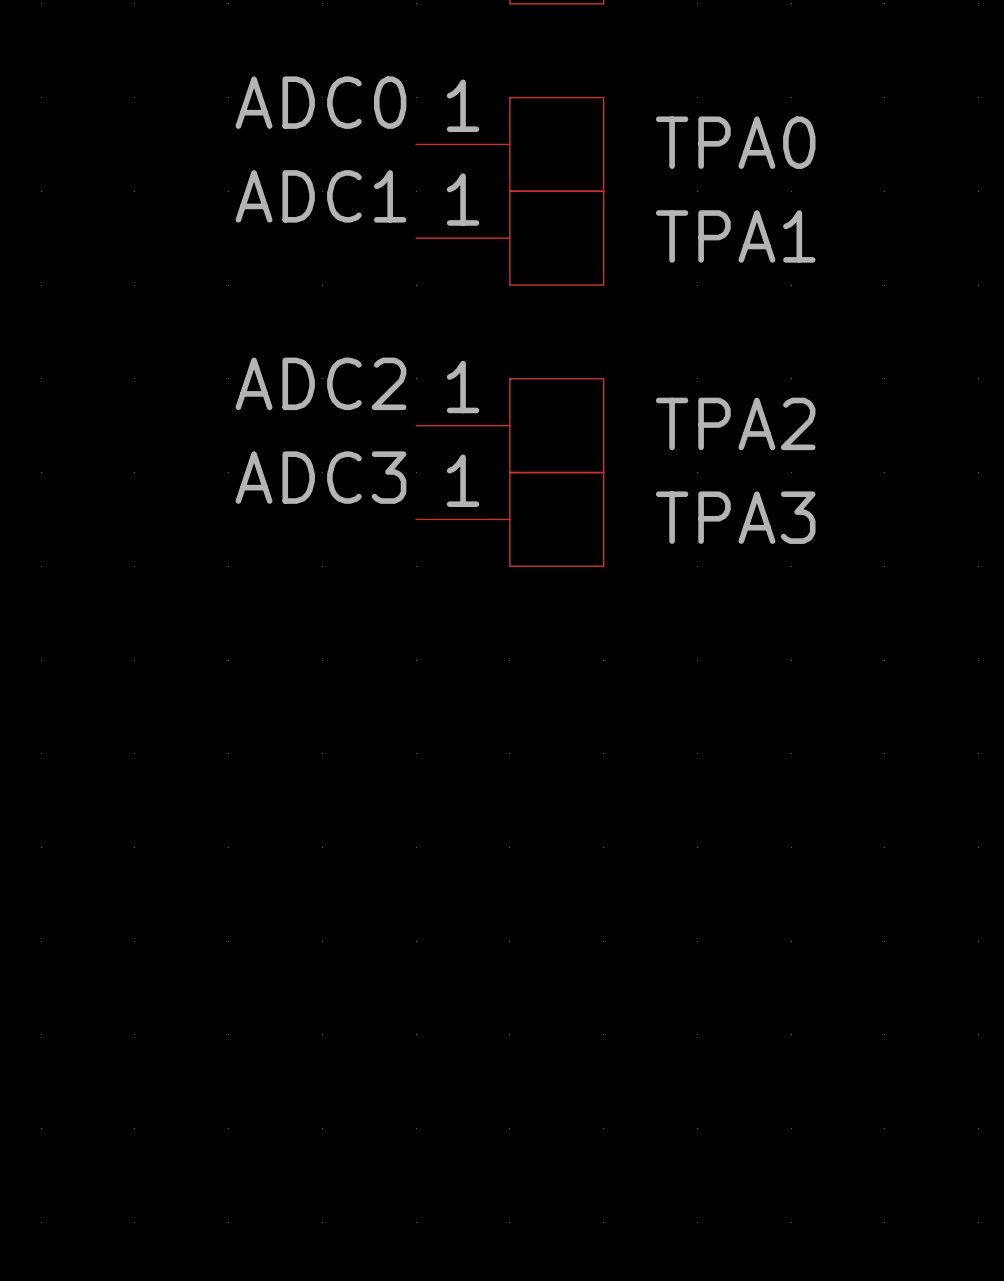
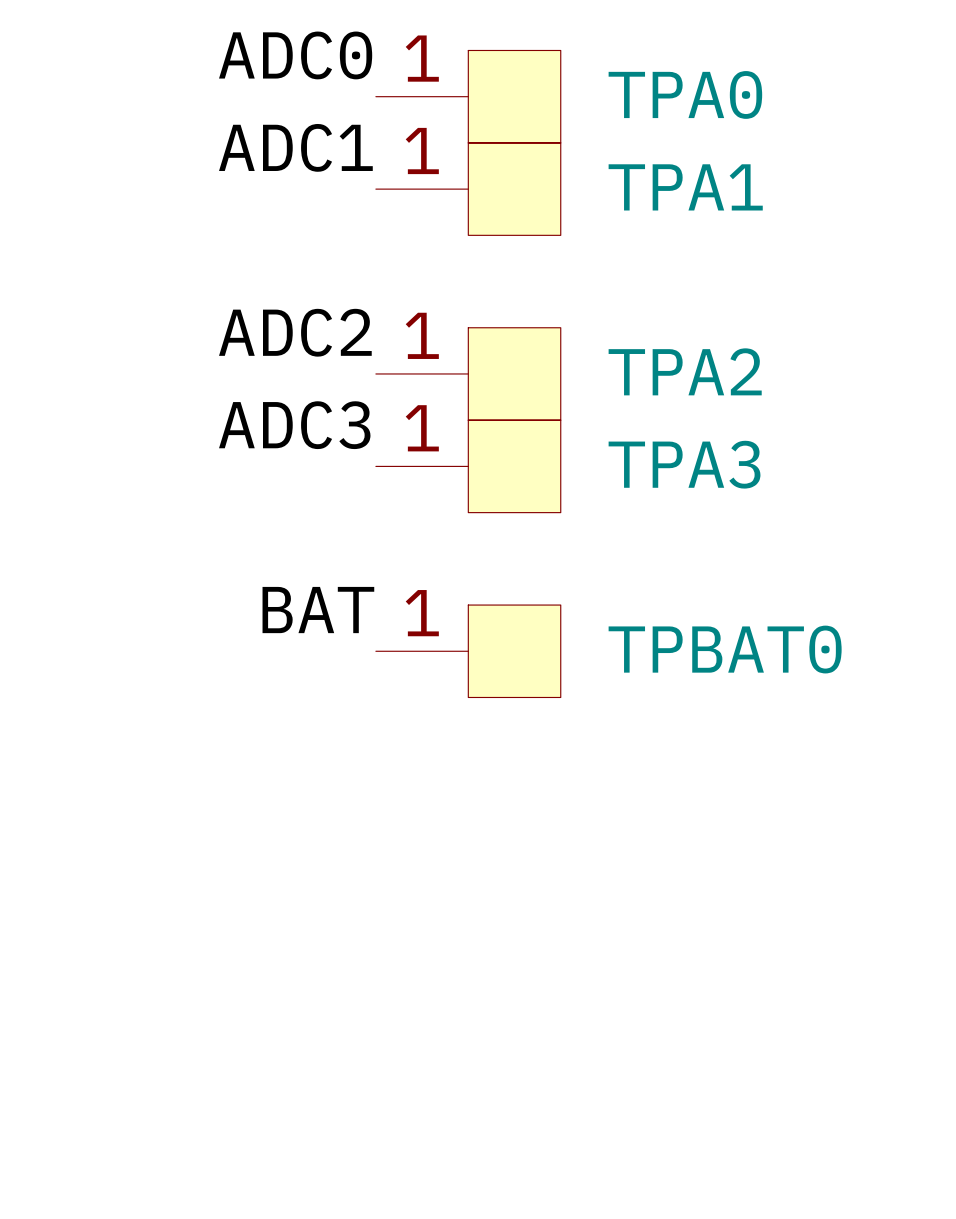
label: none -> BAT (318, 610)
TPBAT0: none -> (468, 651)

